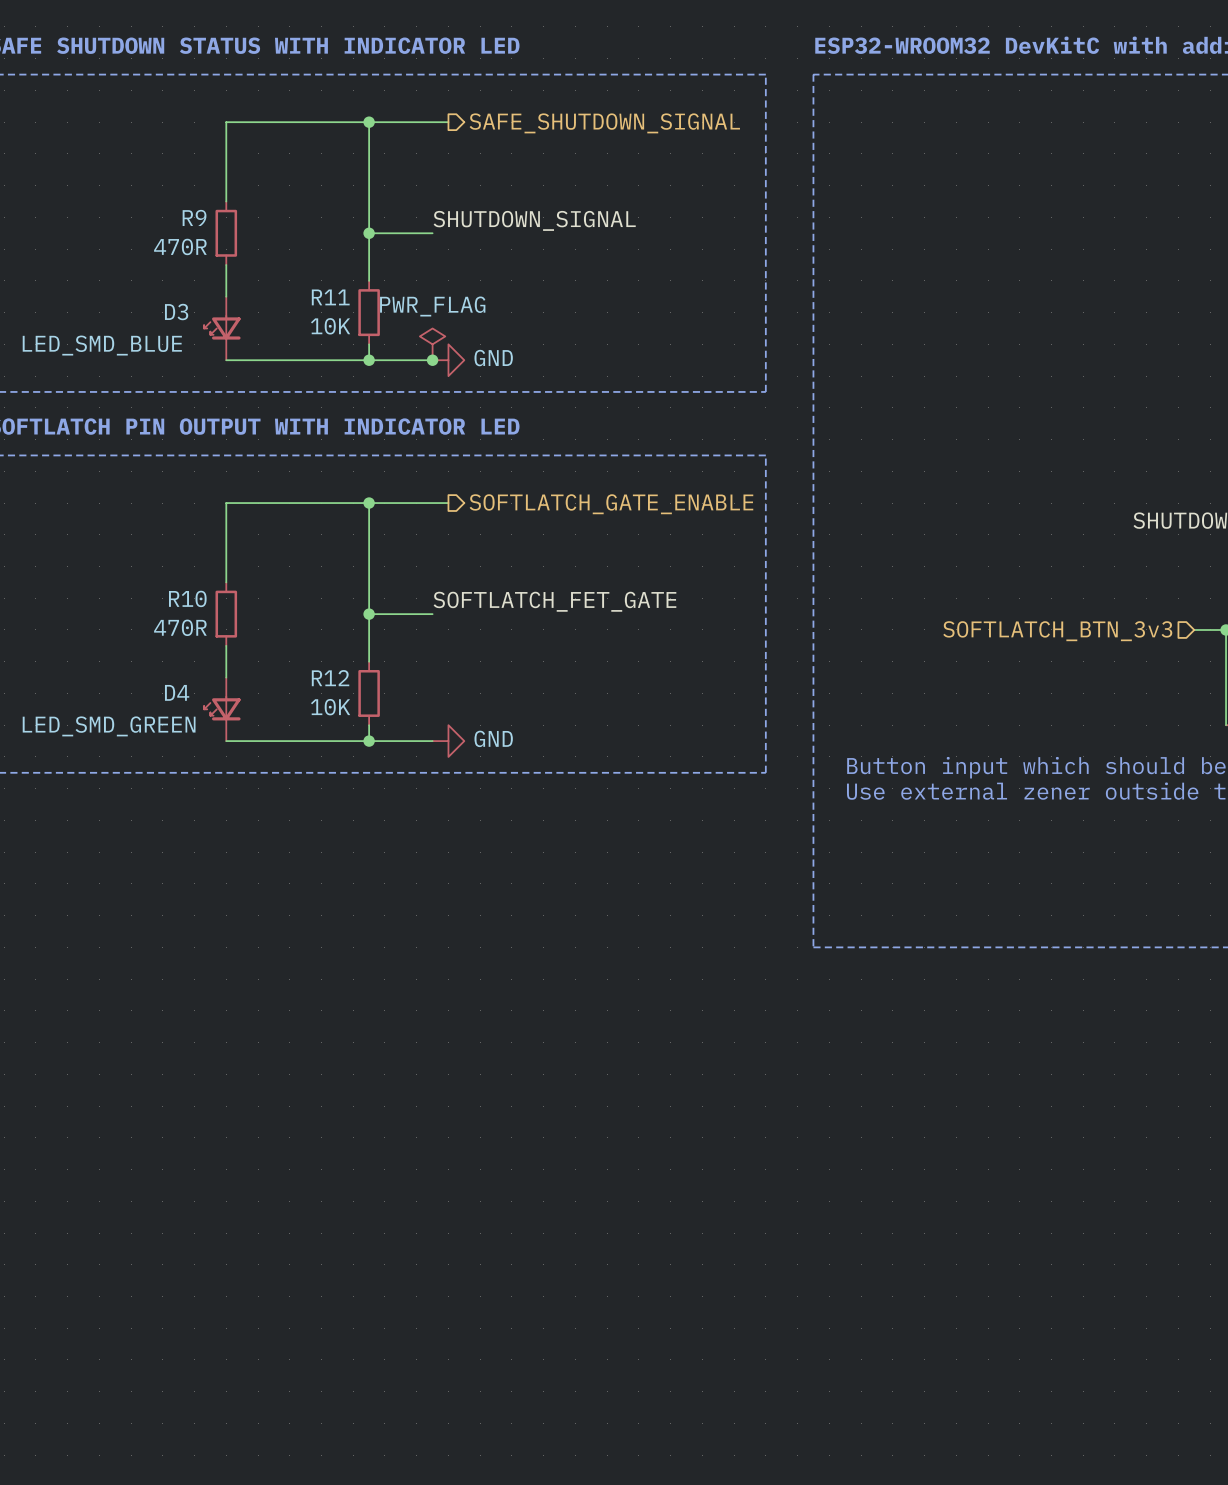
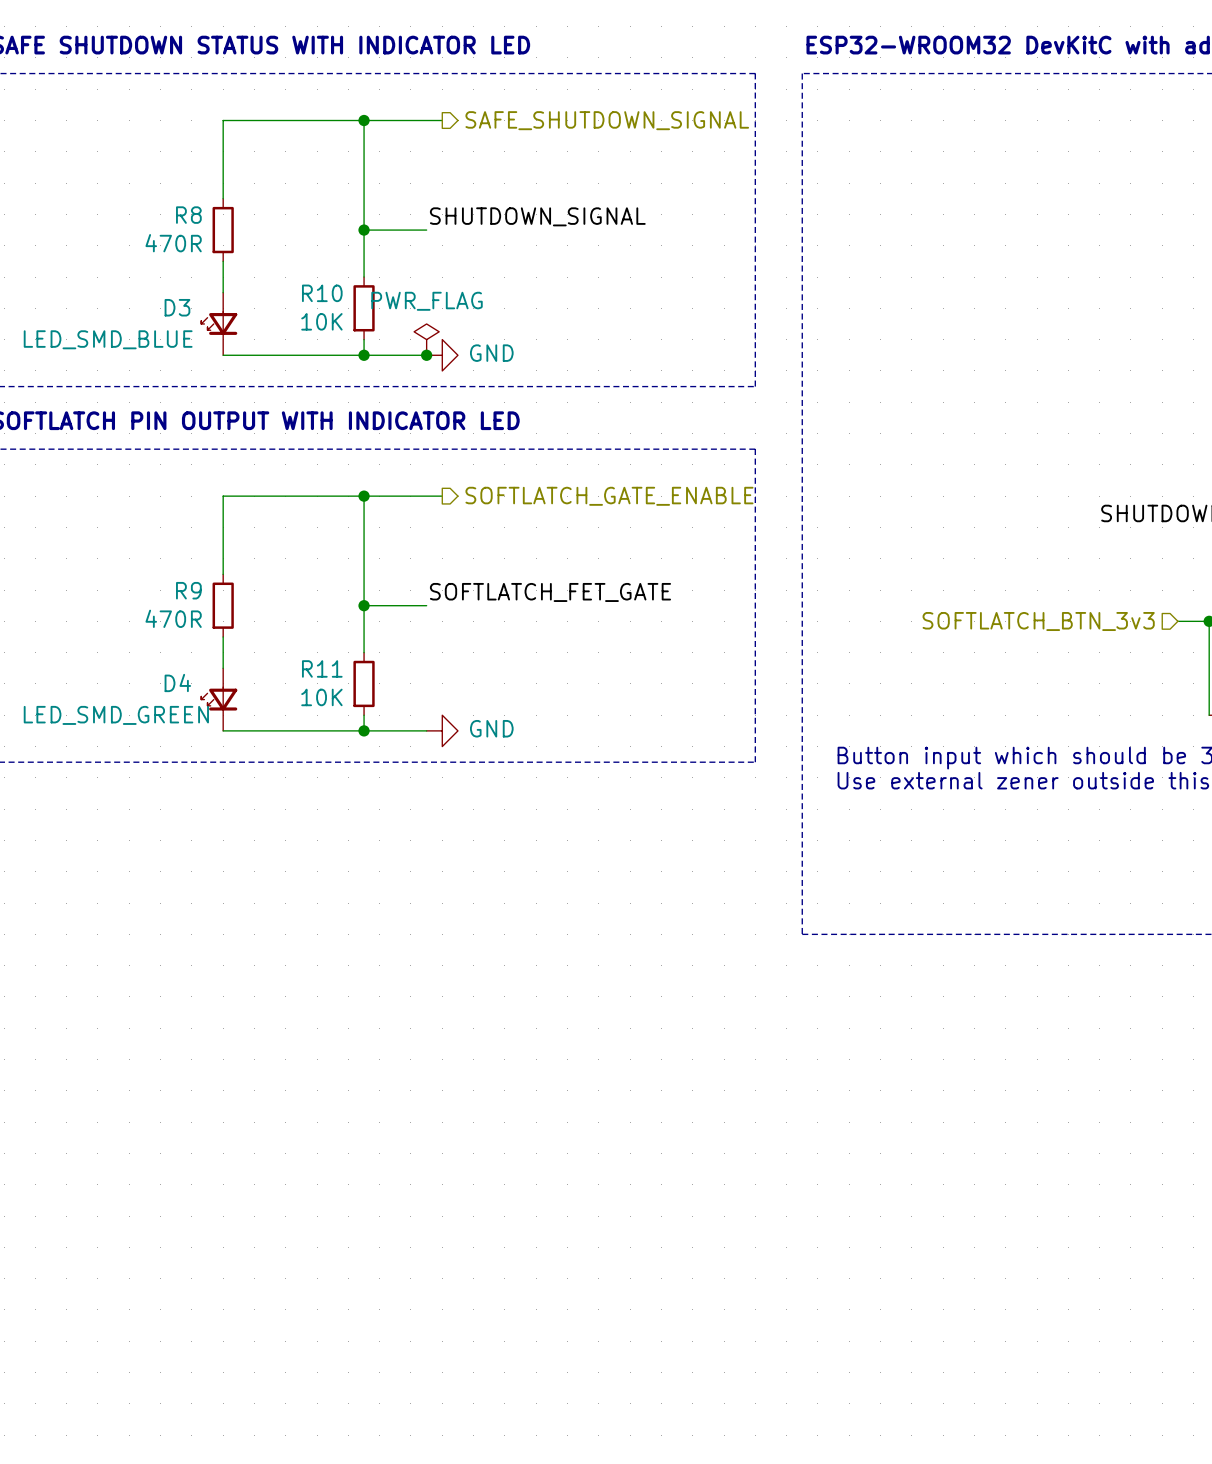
R9 name: R9 (194, 217) -> R8 (188, 215)
R11 name: R11 (330, 297) -> R10 (322, 293)
R10 name: R10 (187, 598) -> R9 (188, 590)
R12 name: R12 (330, 678) -> R11 (322, 668)

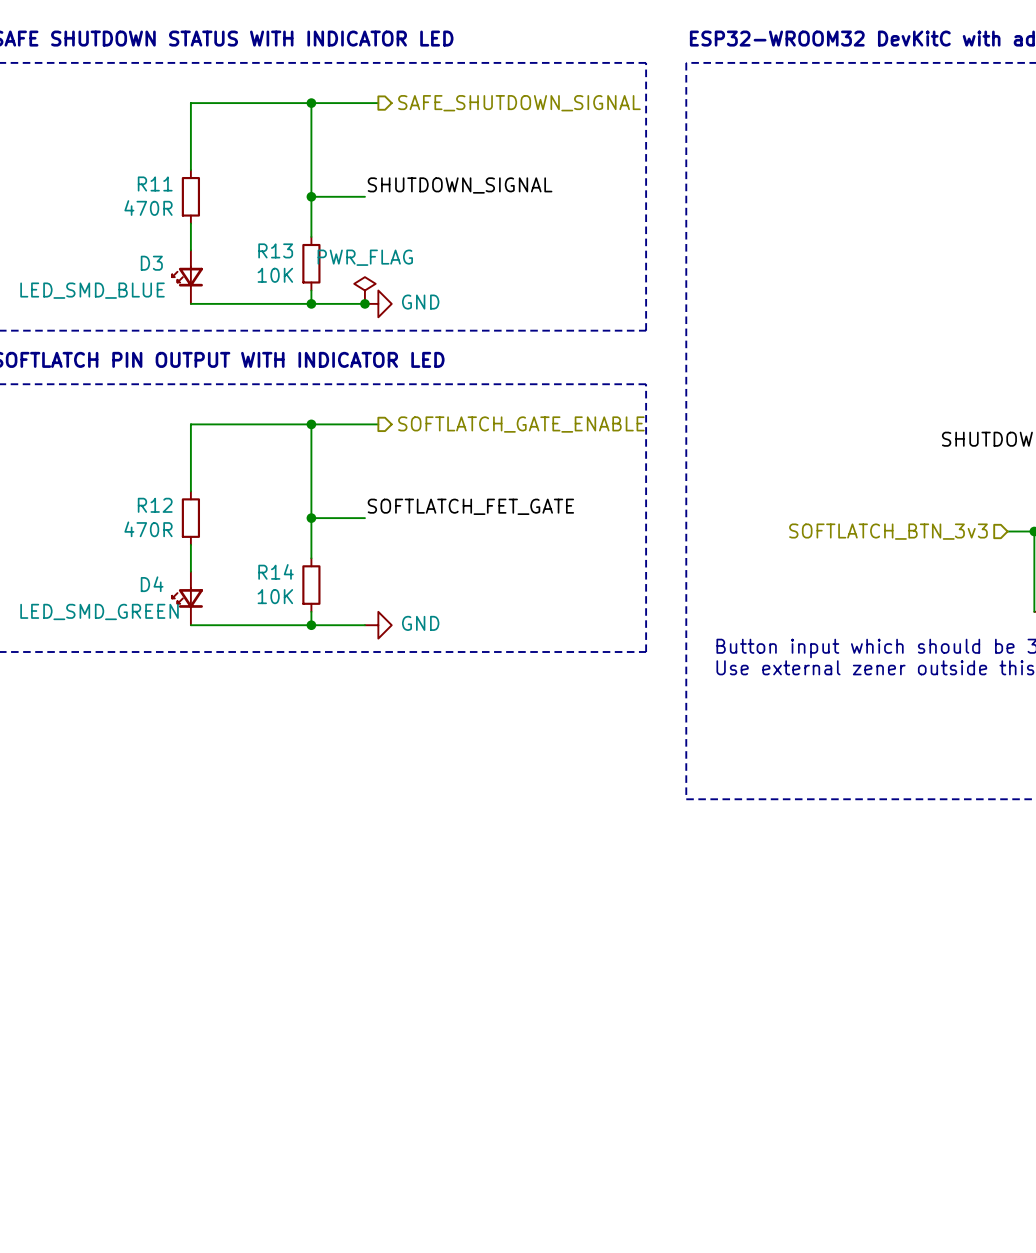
R8 name: R8 (188, 215) -> R11 (155, 183)
R10 name: R10 (322, 293) -> R13 (275, 250)
R9 name: R9 (188, 590) -> R12 (155, 505)
R11 name: R11 (322, 668) -> R14 (276, 571)

